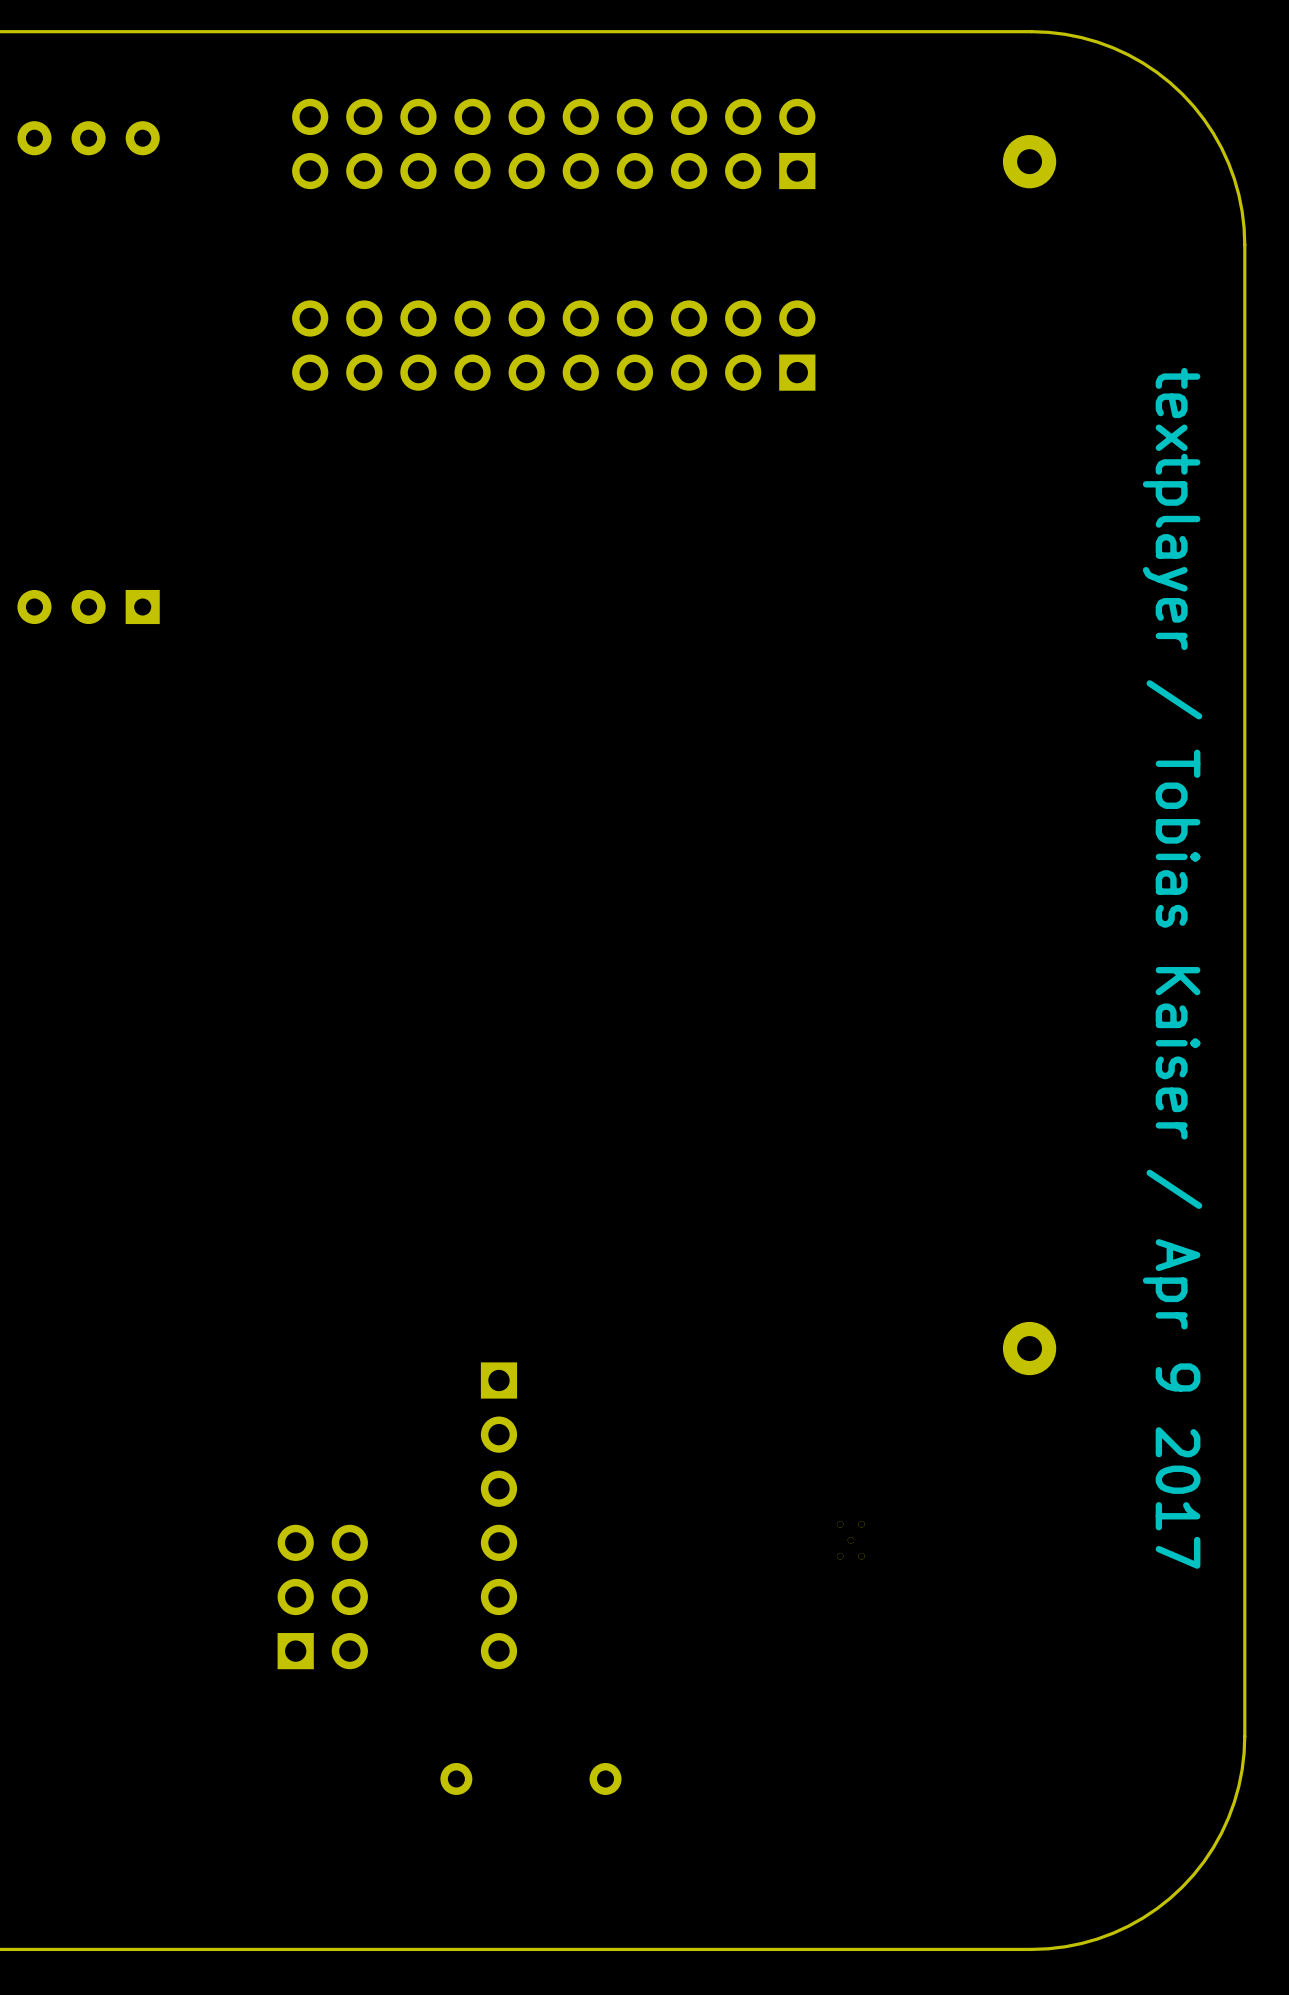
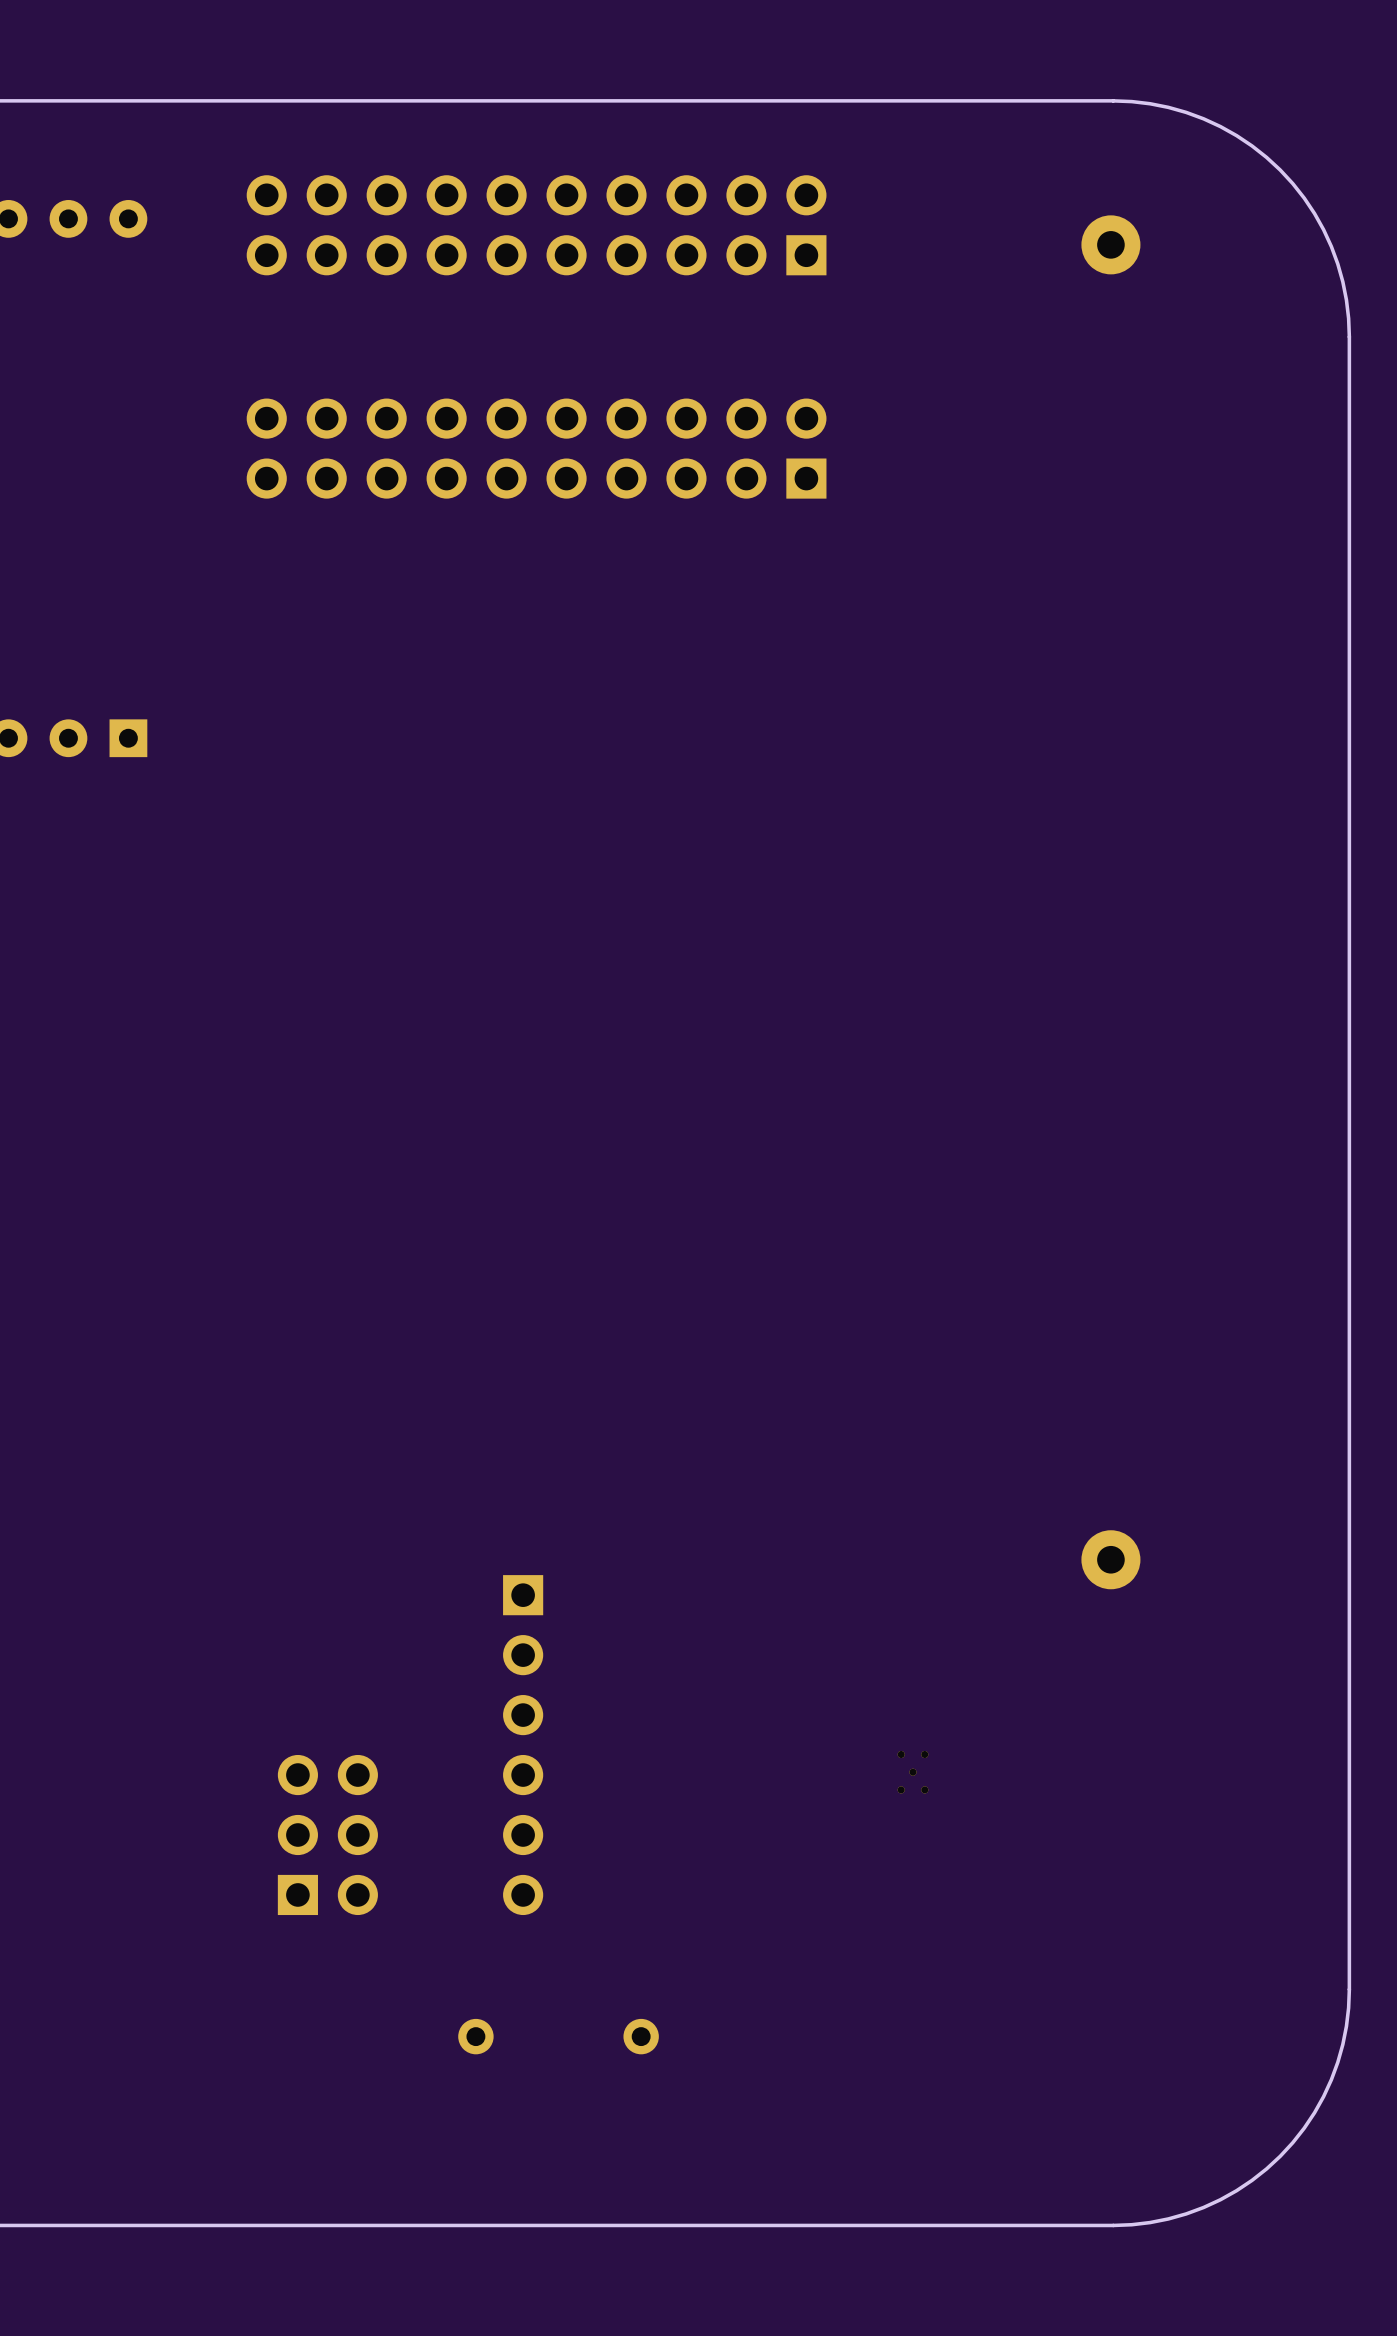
part position: (553, 143) -> (536, 225)
part position: (553, 345) -> (536, 448)
text: textplayer / Tobias Kaiser / Apr 9 2017 (1172, 968) -> none

